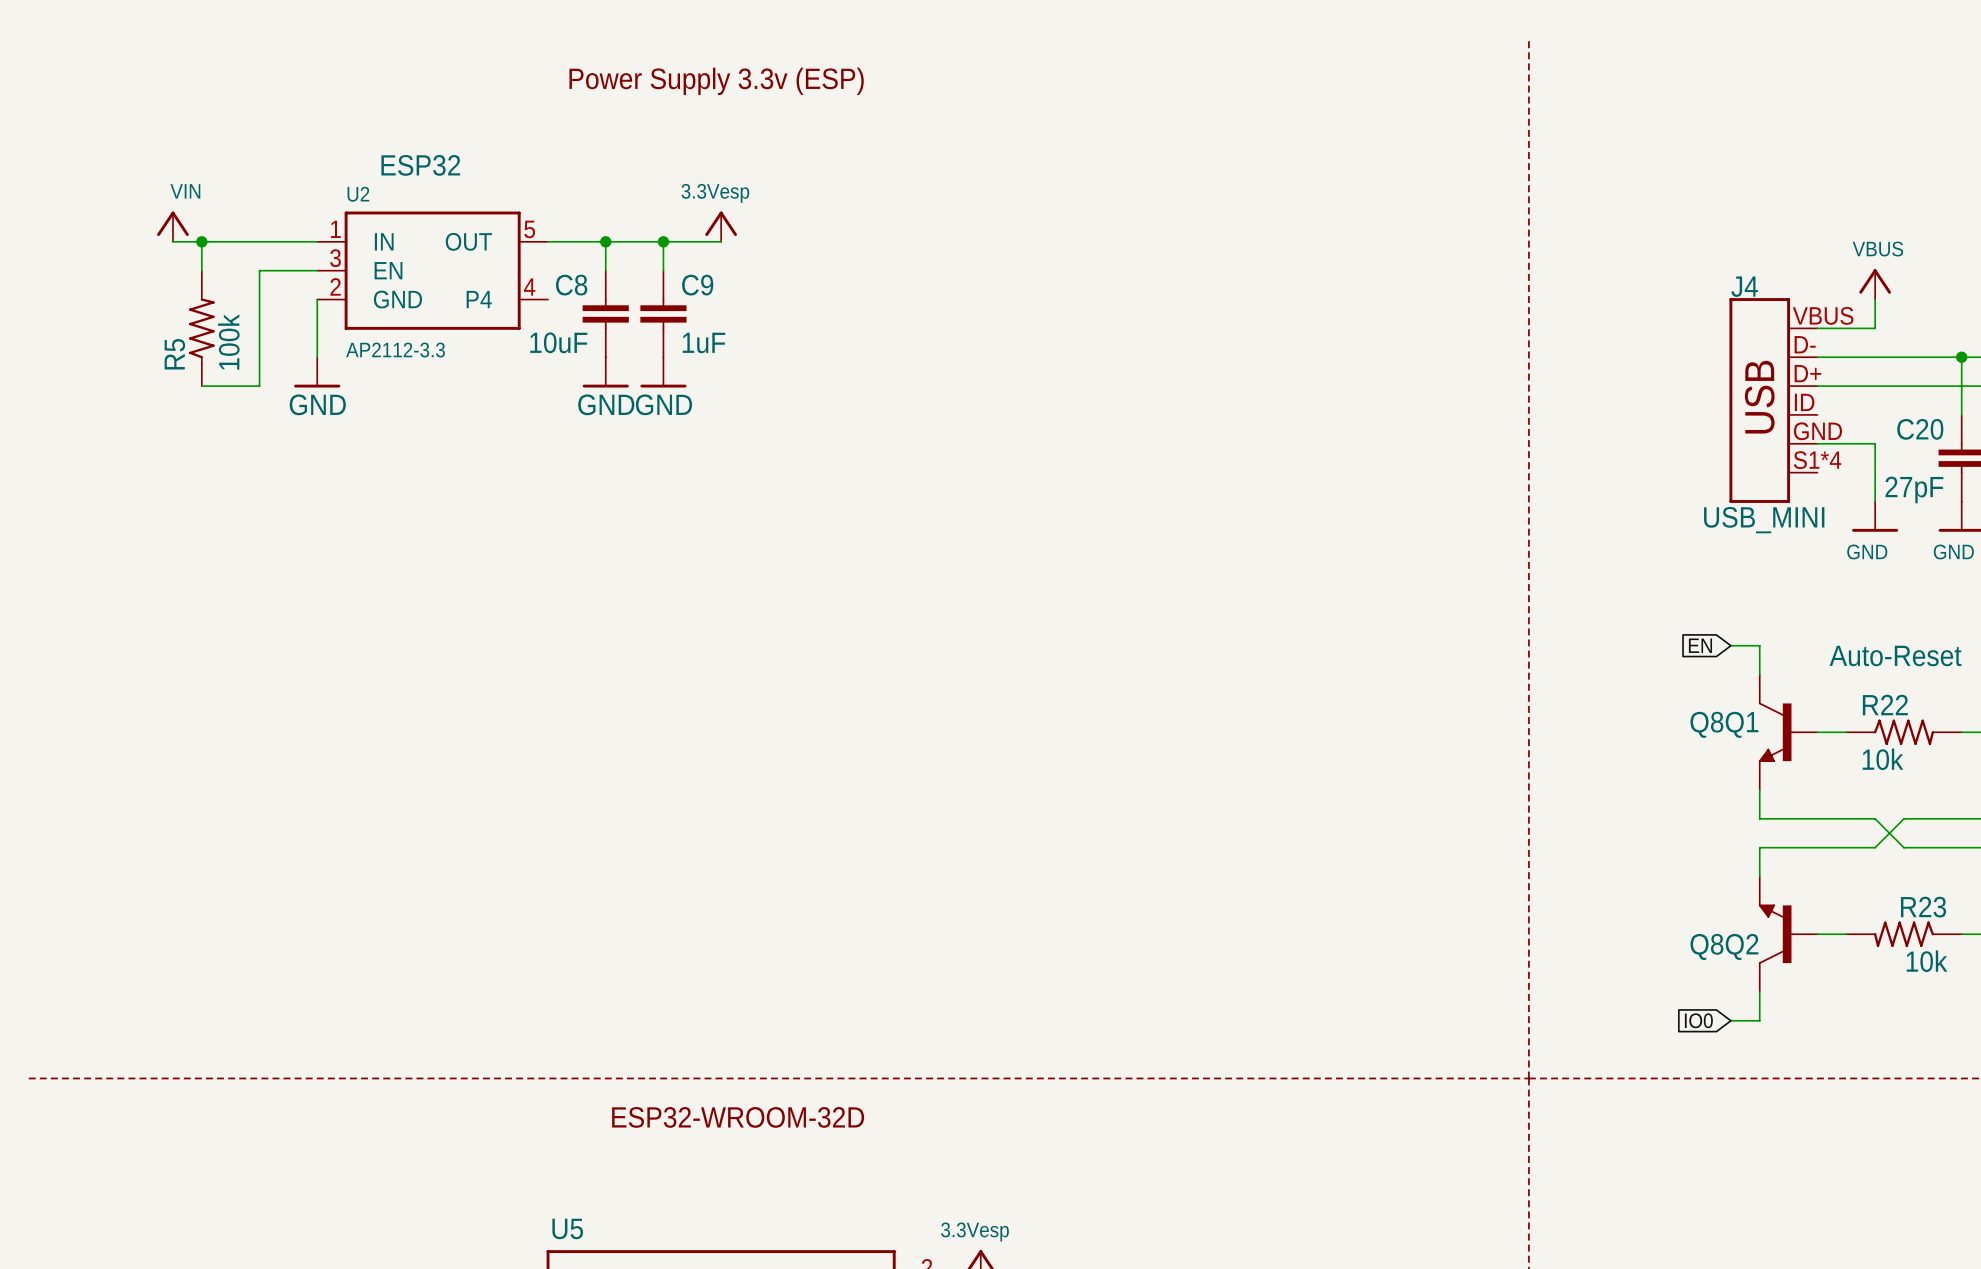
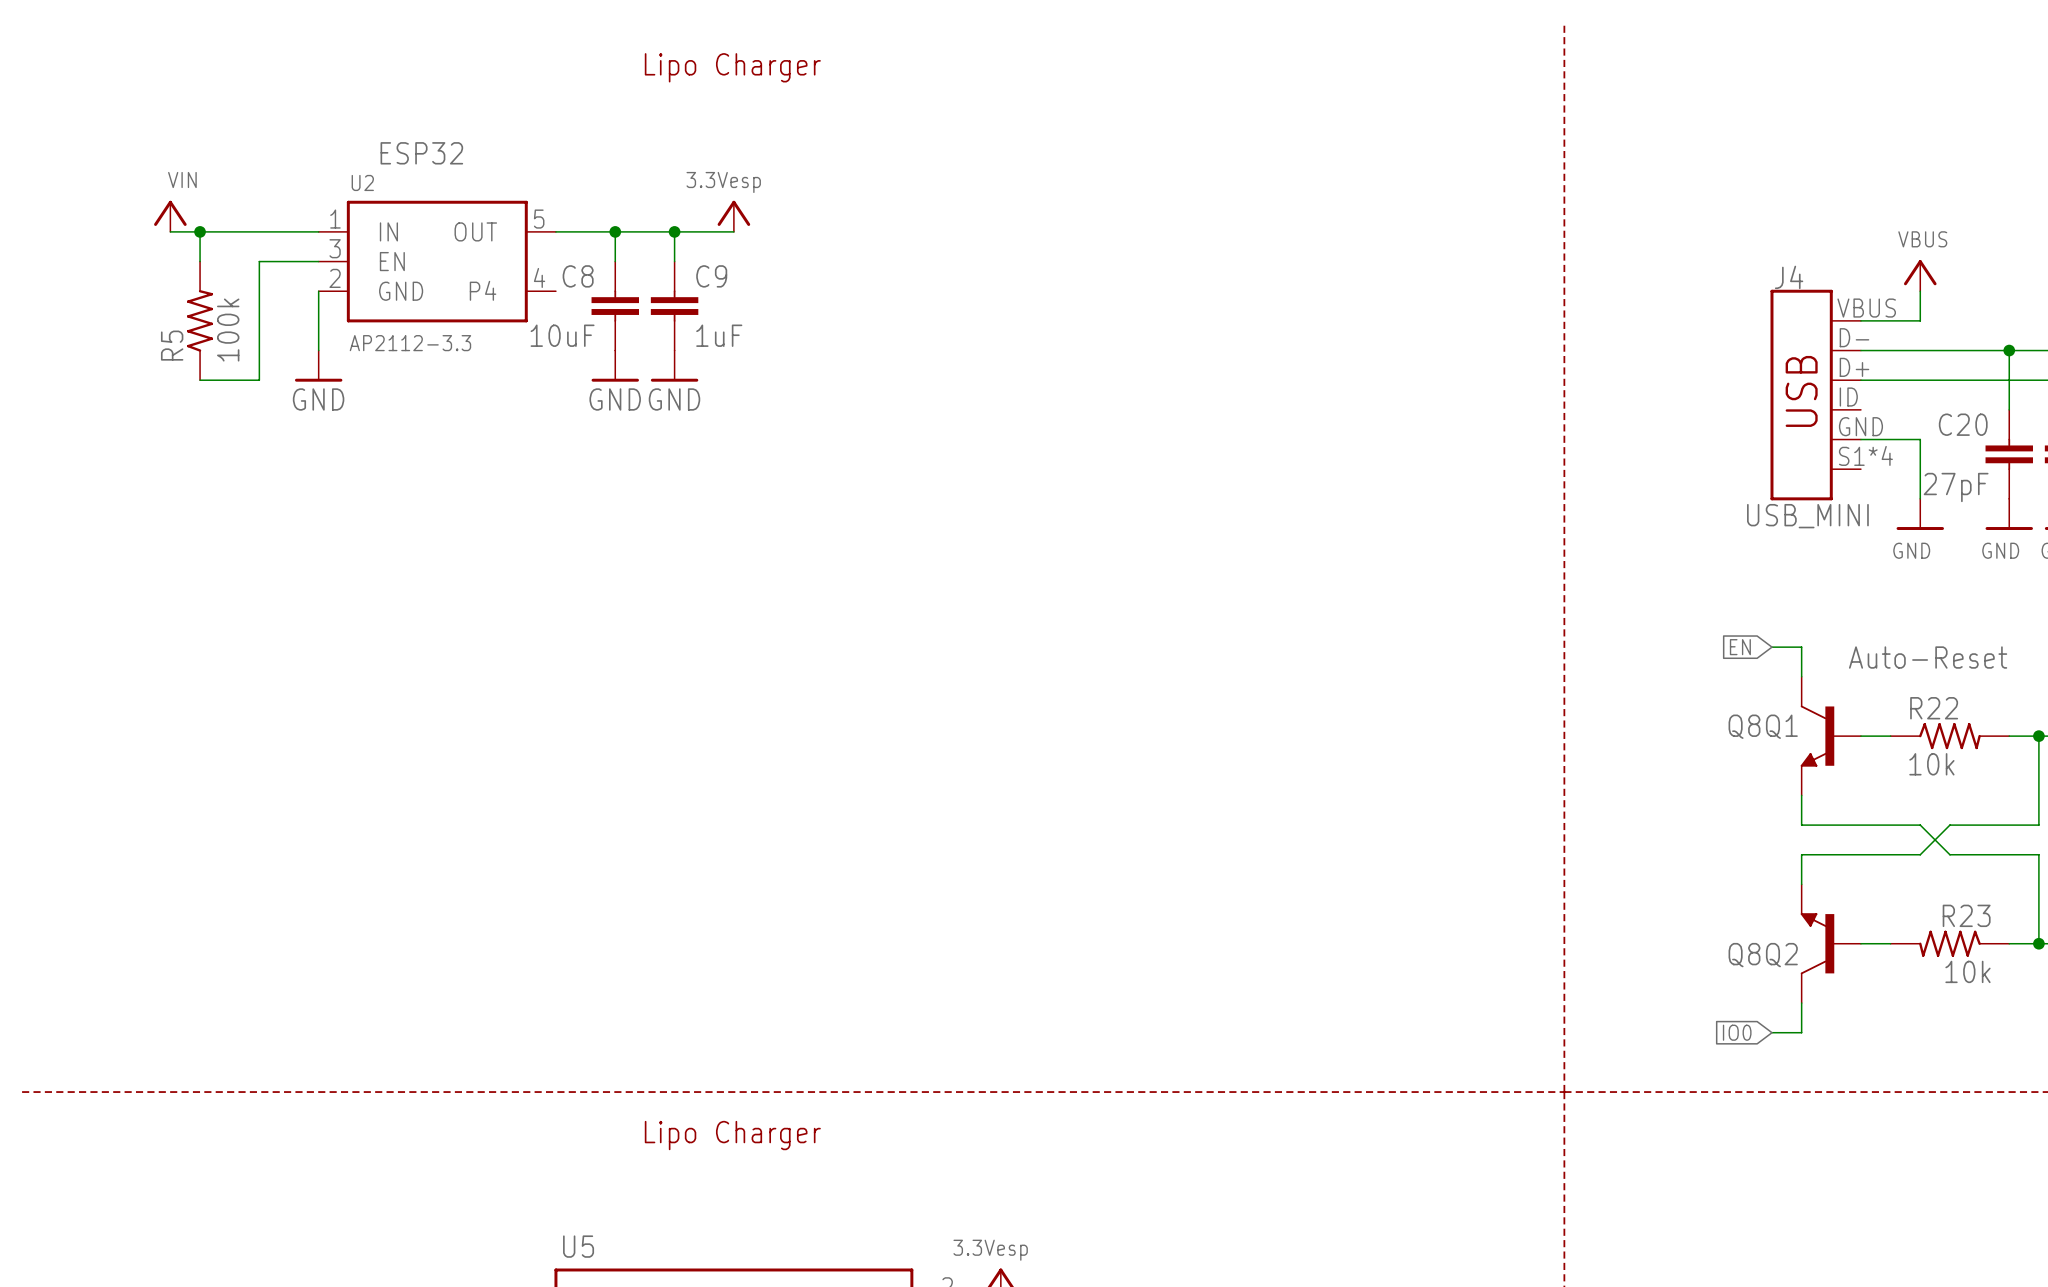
text: Power Supply 3.3v (ESP) (716, 81) -> none
text: none -> Lipo Charger (732, 67)
text: ESP32-WROOM-32D (738, 1117) -> none
text: none -> Lipo Charger (732, 1135)

